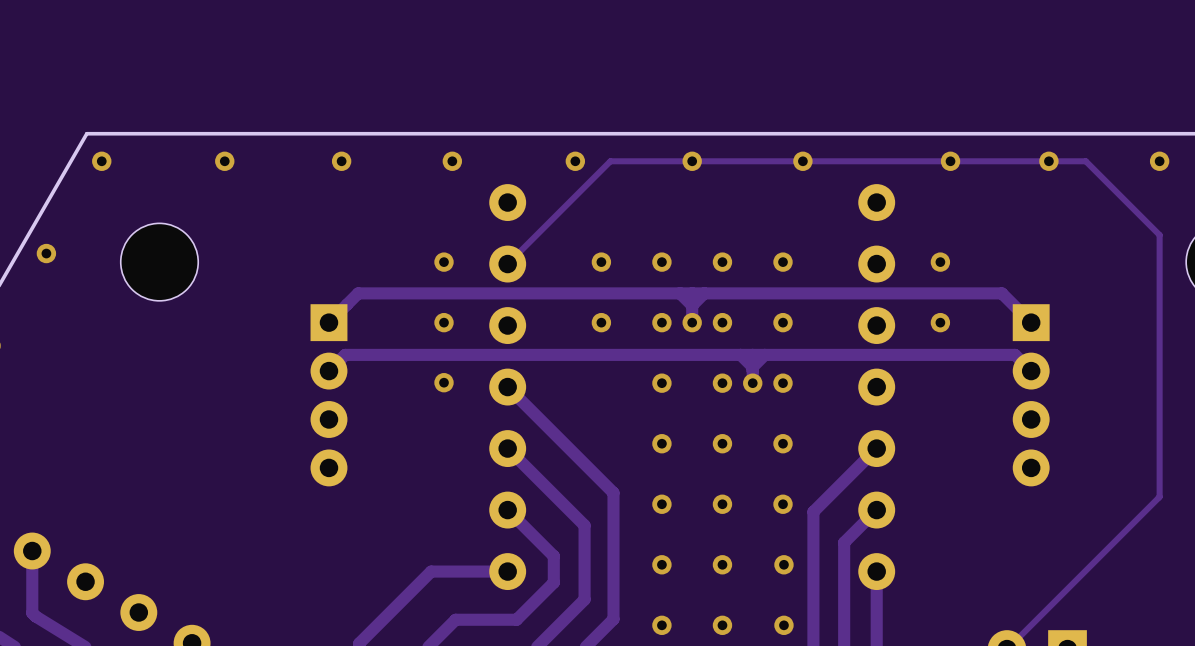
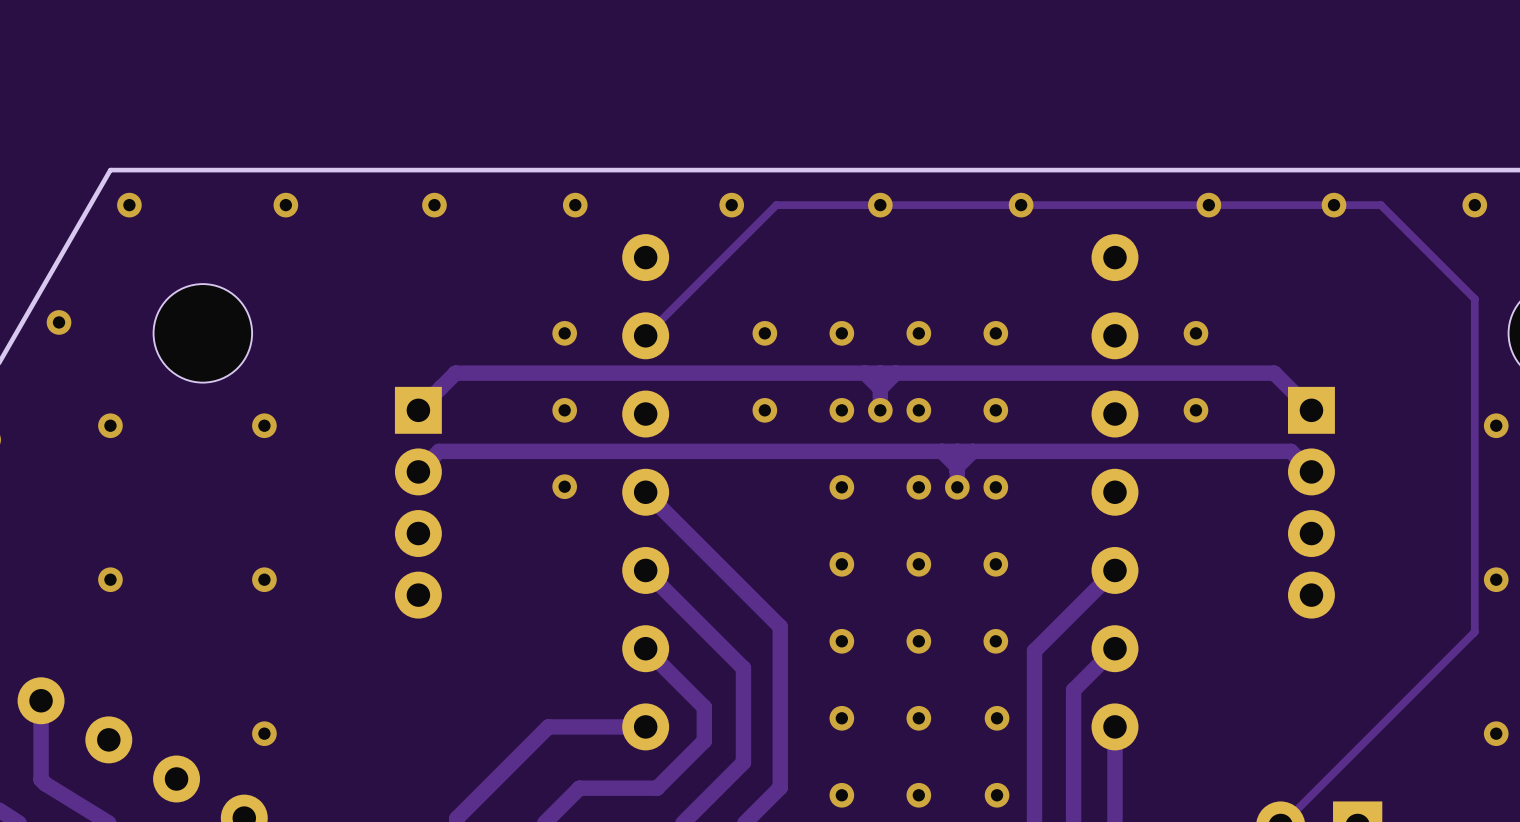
via: none -> (110, 425)
via: none -> (264, 425)
via: none -> (1496, 425)
via: none -> (110, 579)
via: none -> (264, 579)
via: none -> (1496, 579)
via: none -> (264, 733)
via: none -> (1496, 733)

